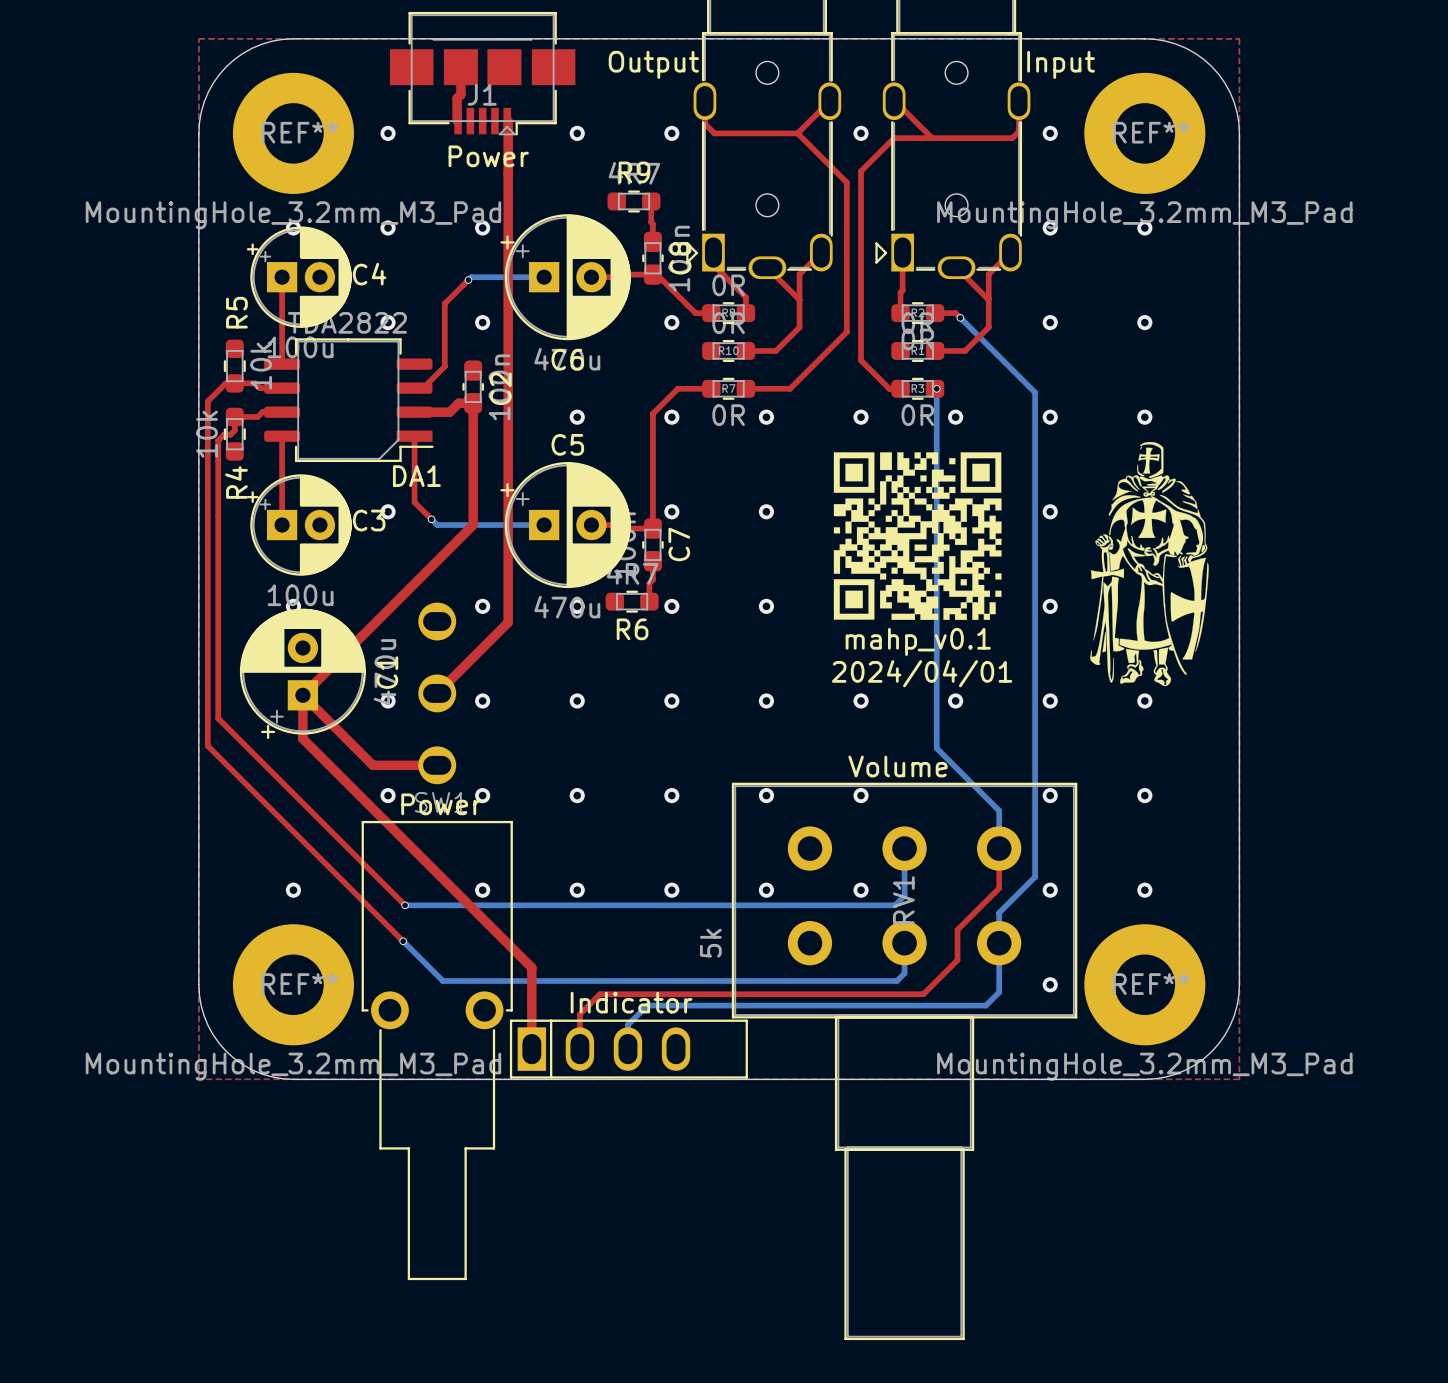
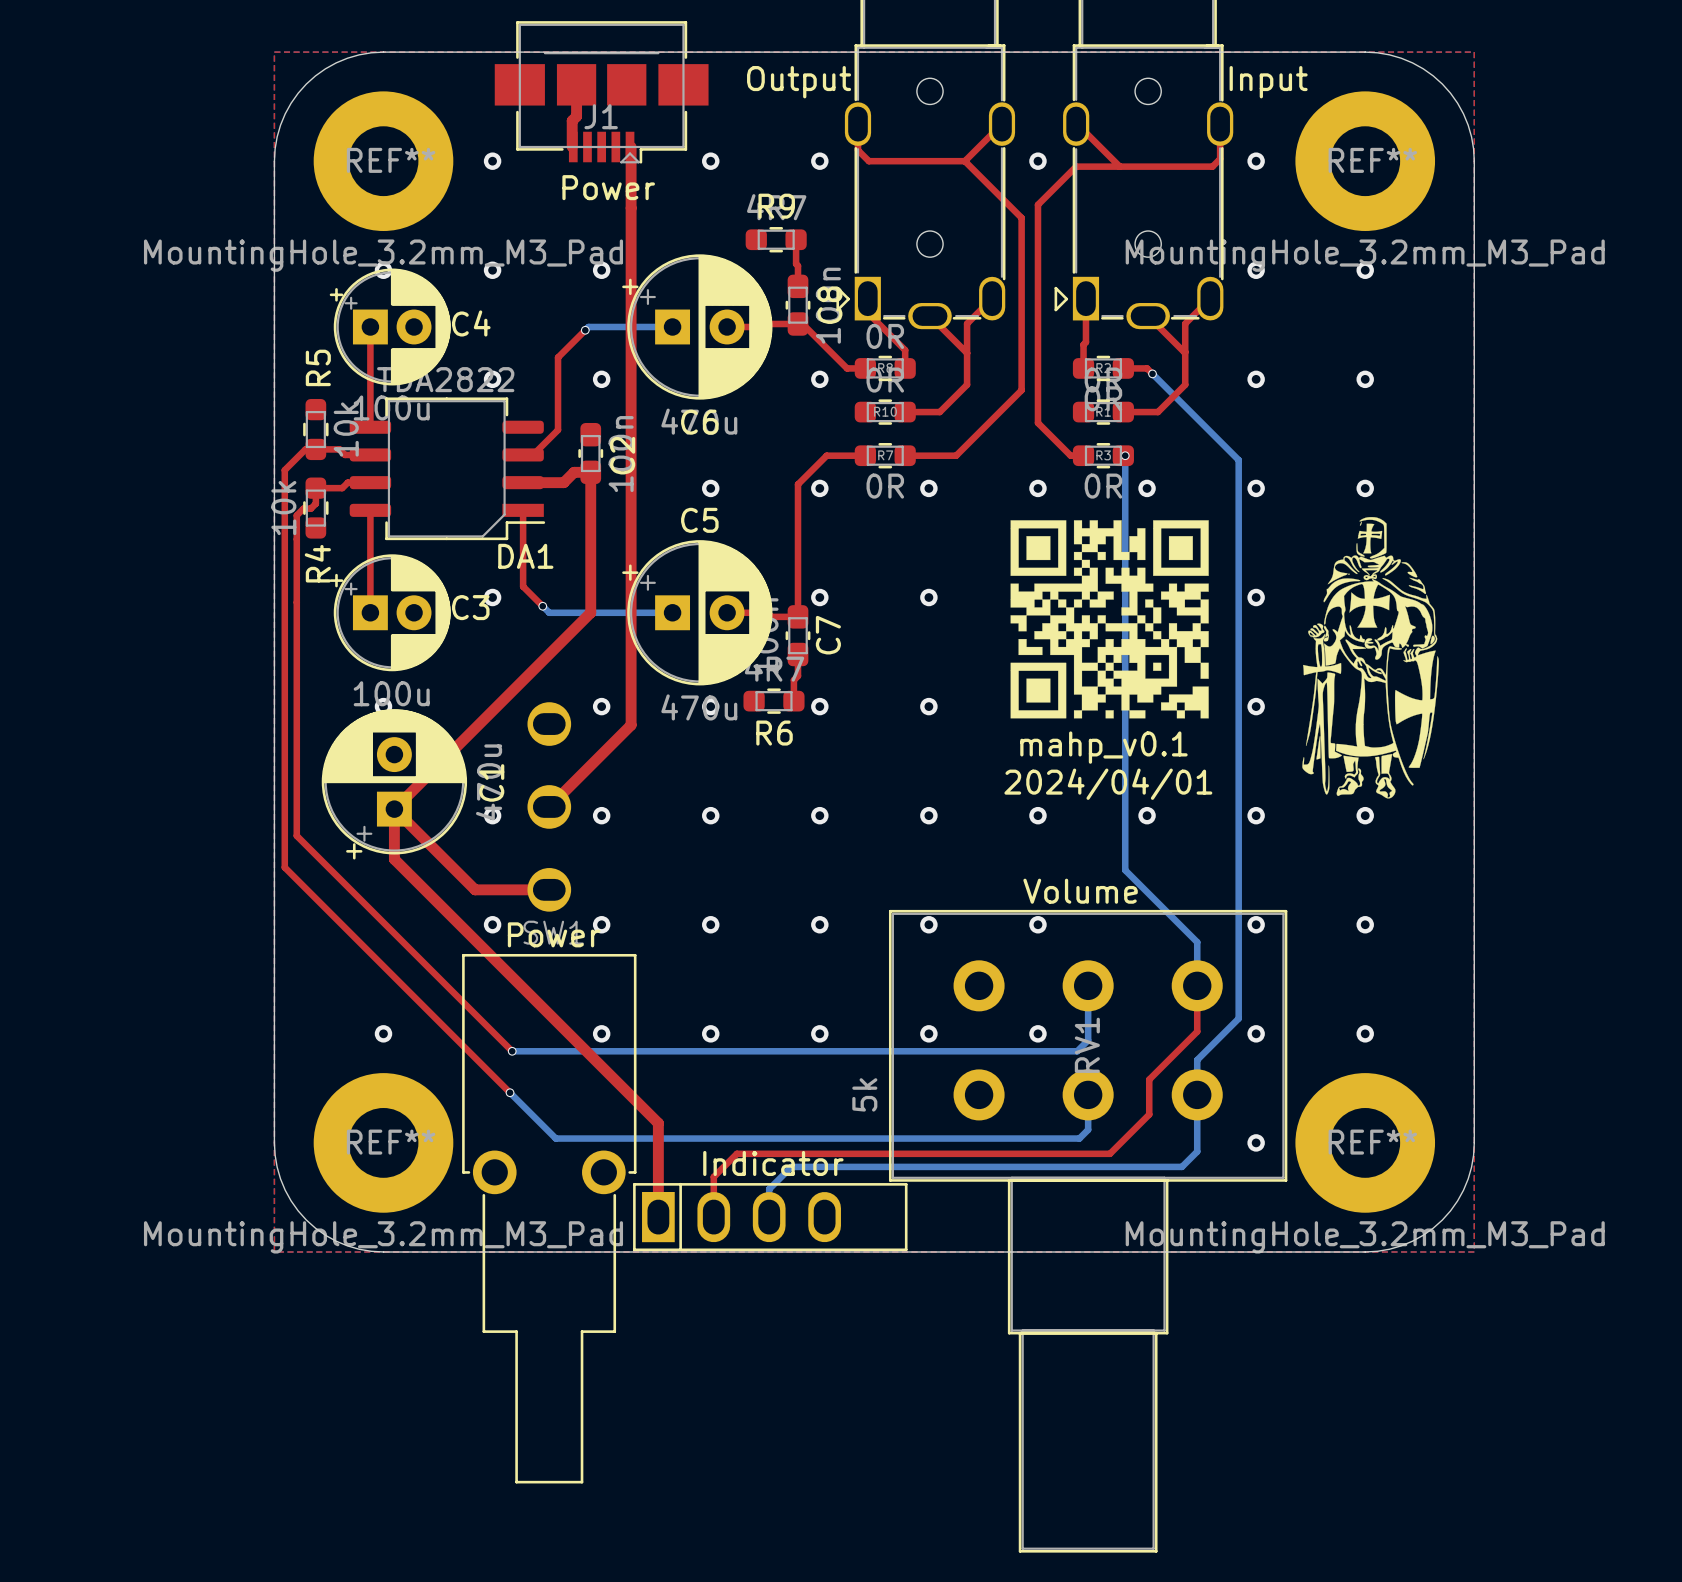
drawing shape: [833, 452, 1002, 620] -> [1010, 520, 1209, 719]

